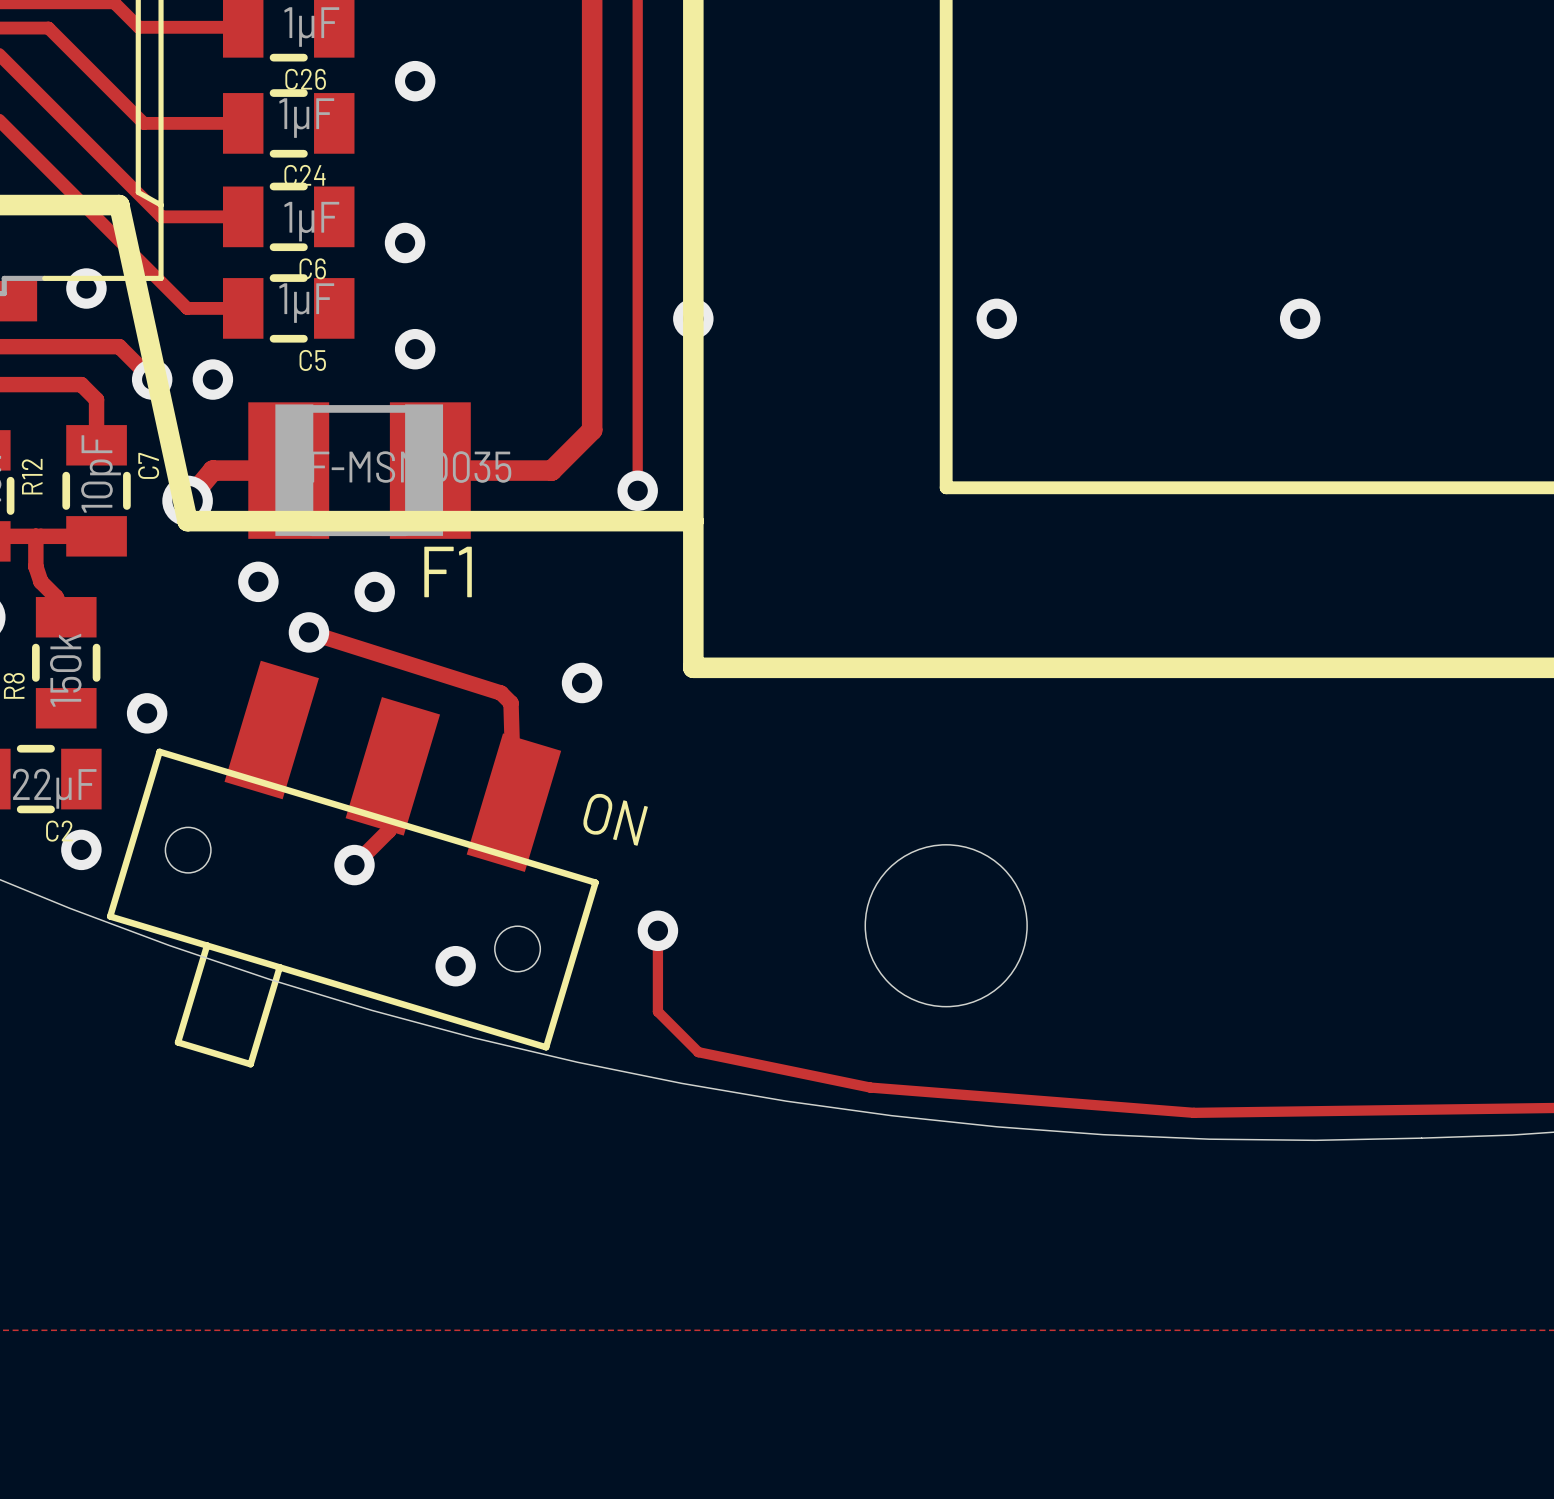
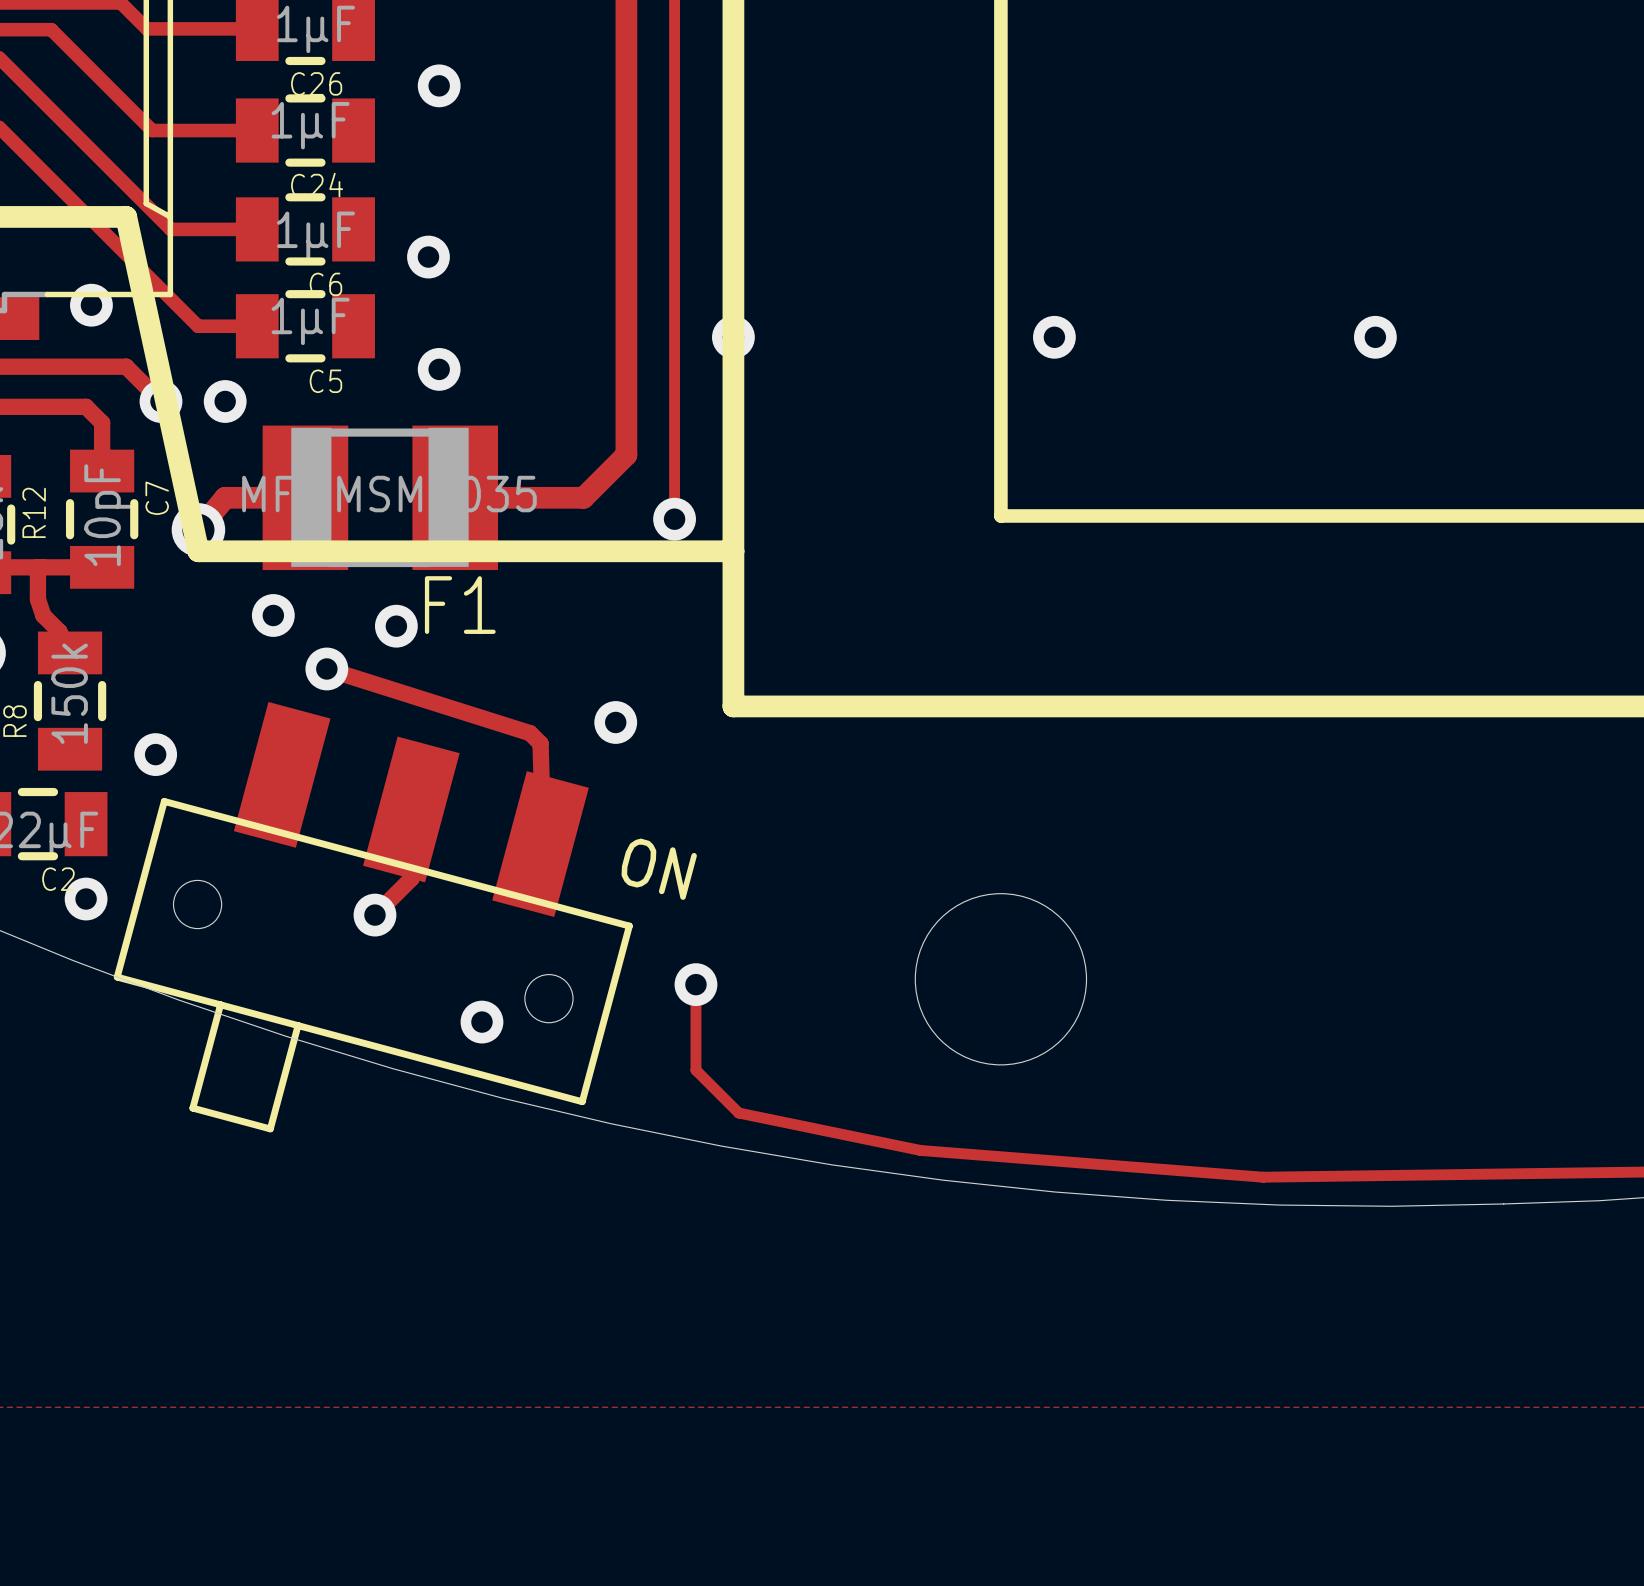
part rotation: 0° (352, 864) -> 1.7° counterclockwise (373, 917)

